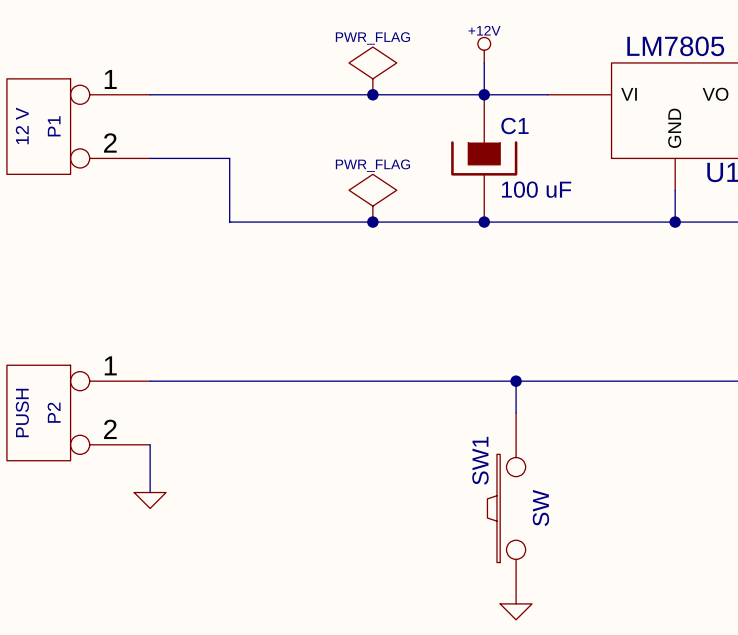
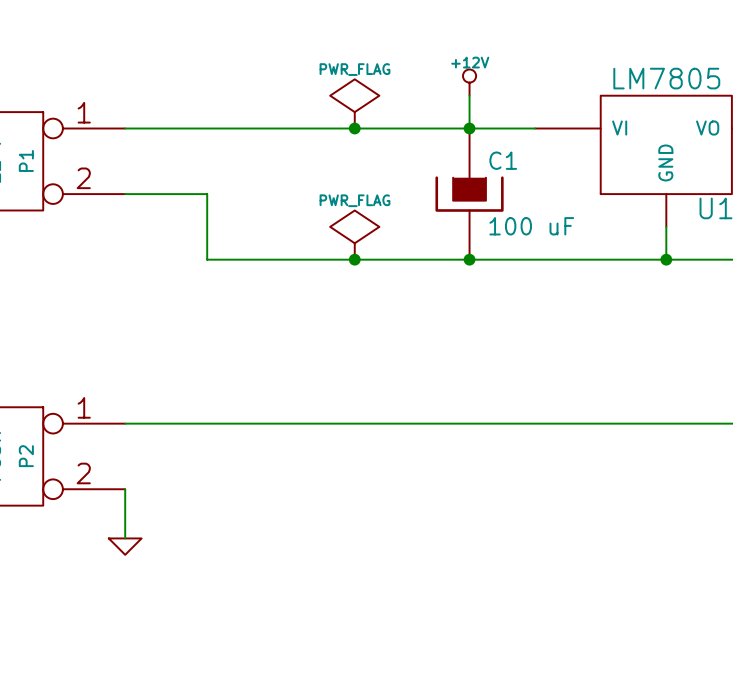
wire: (516, 381) (516, 412) -> none
junction: (516, 381) -> none
SW1: SW (506, 508) -> none
power symbol: (516, 611) -> none

